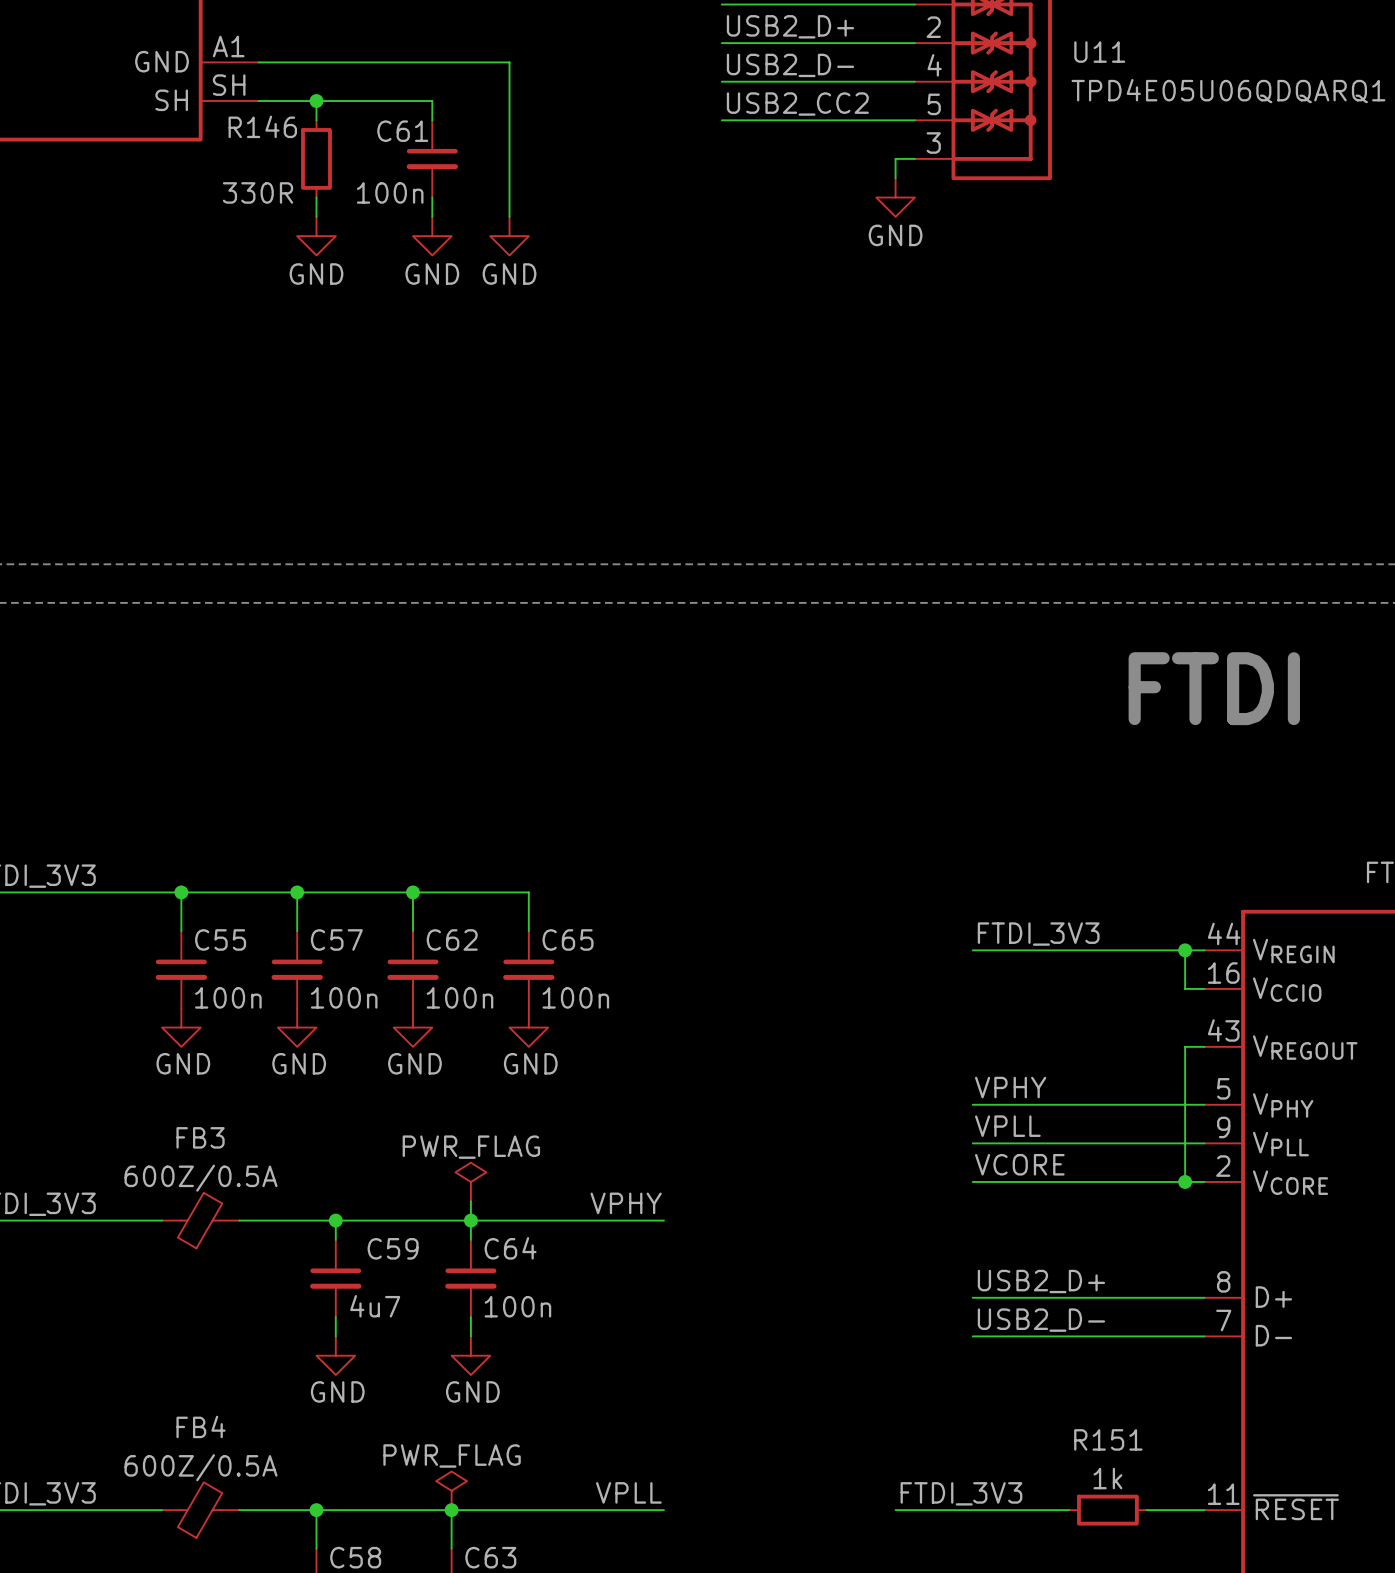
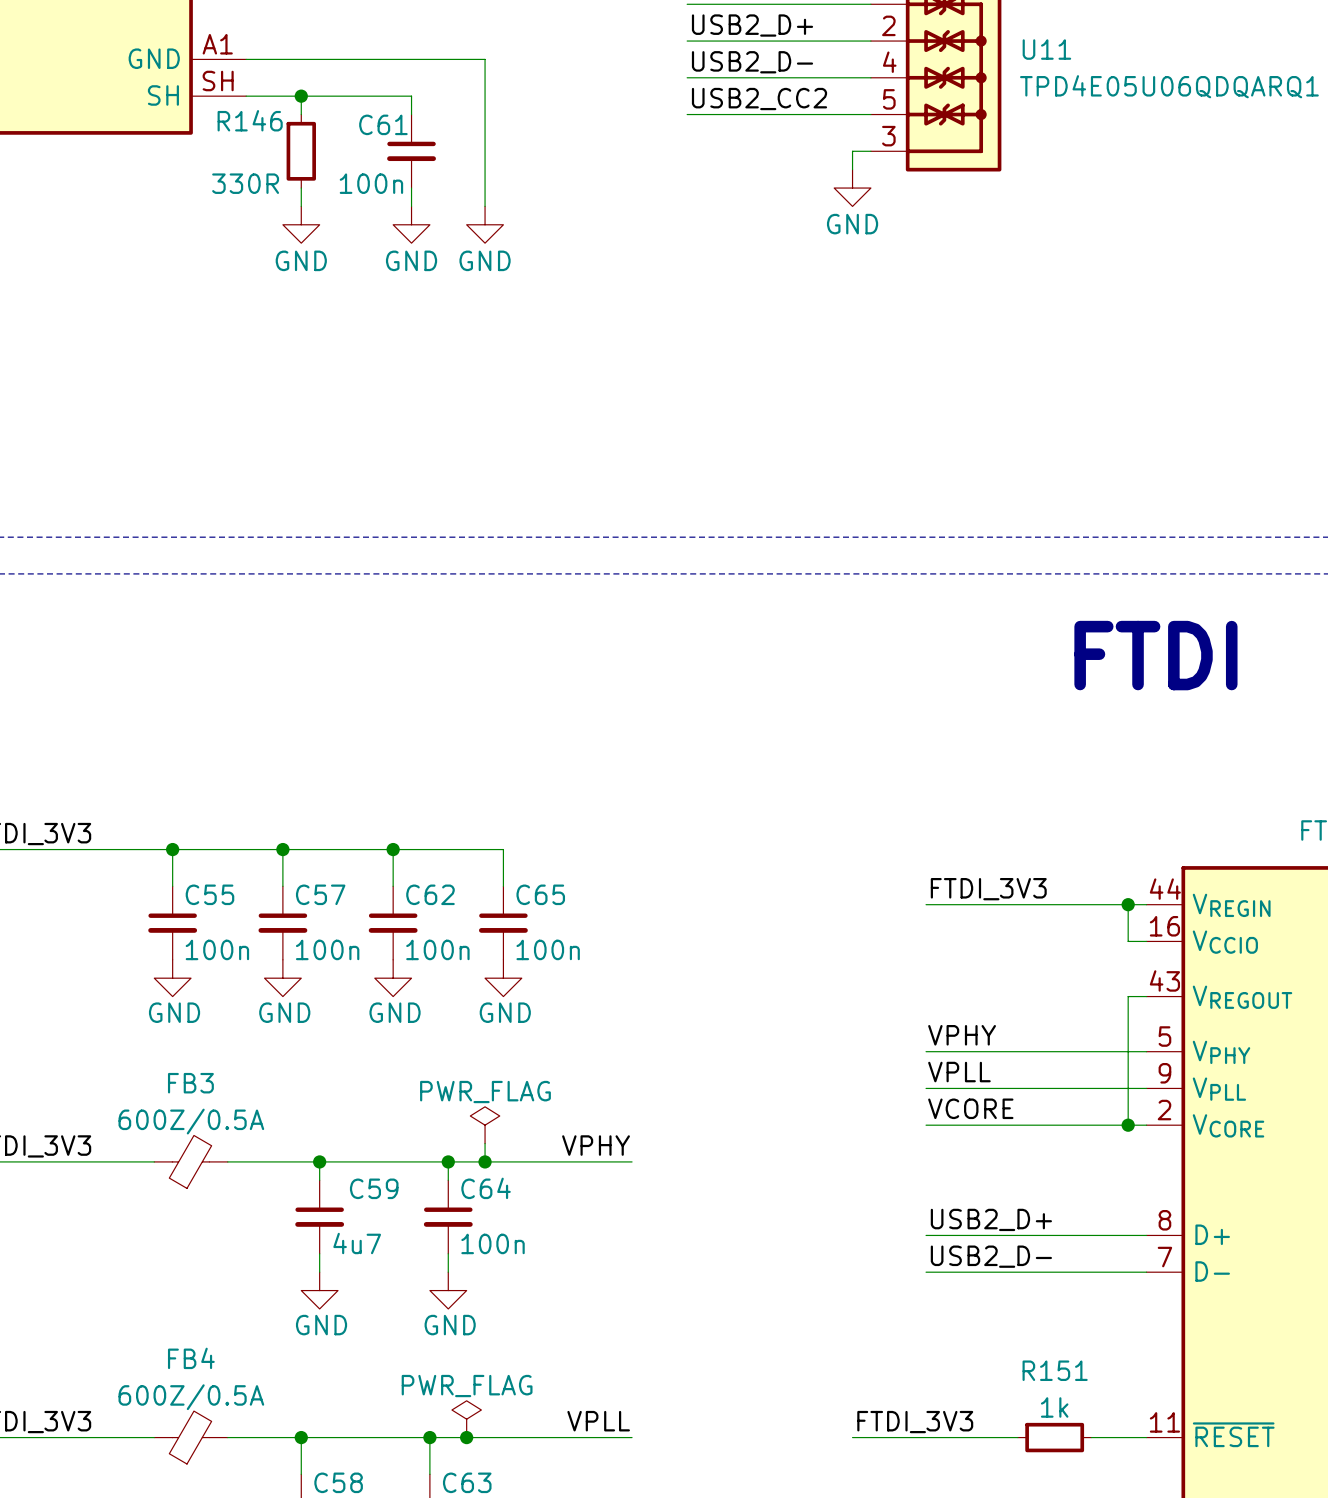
power symbol position: PWR_FLAG (470, 1181) -> PWR_FLAG (485, 1125)
wire: (470, 1201) (470, 1220) -> (485, 1143) (485, 1161)
junction: none -> (485, 1161)
power symbol position: PWR_FLAG (451, 1490) -> PWR_FLAG (466, 1419)
junction: none -> (466, 1437)

